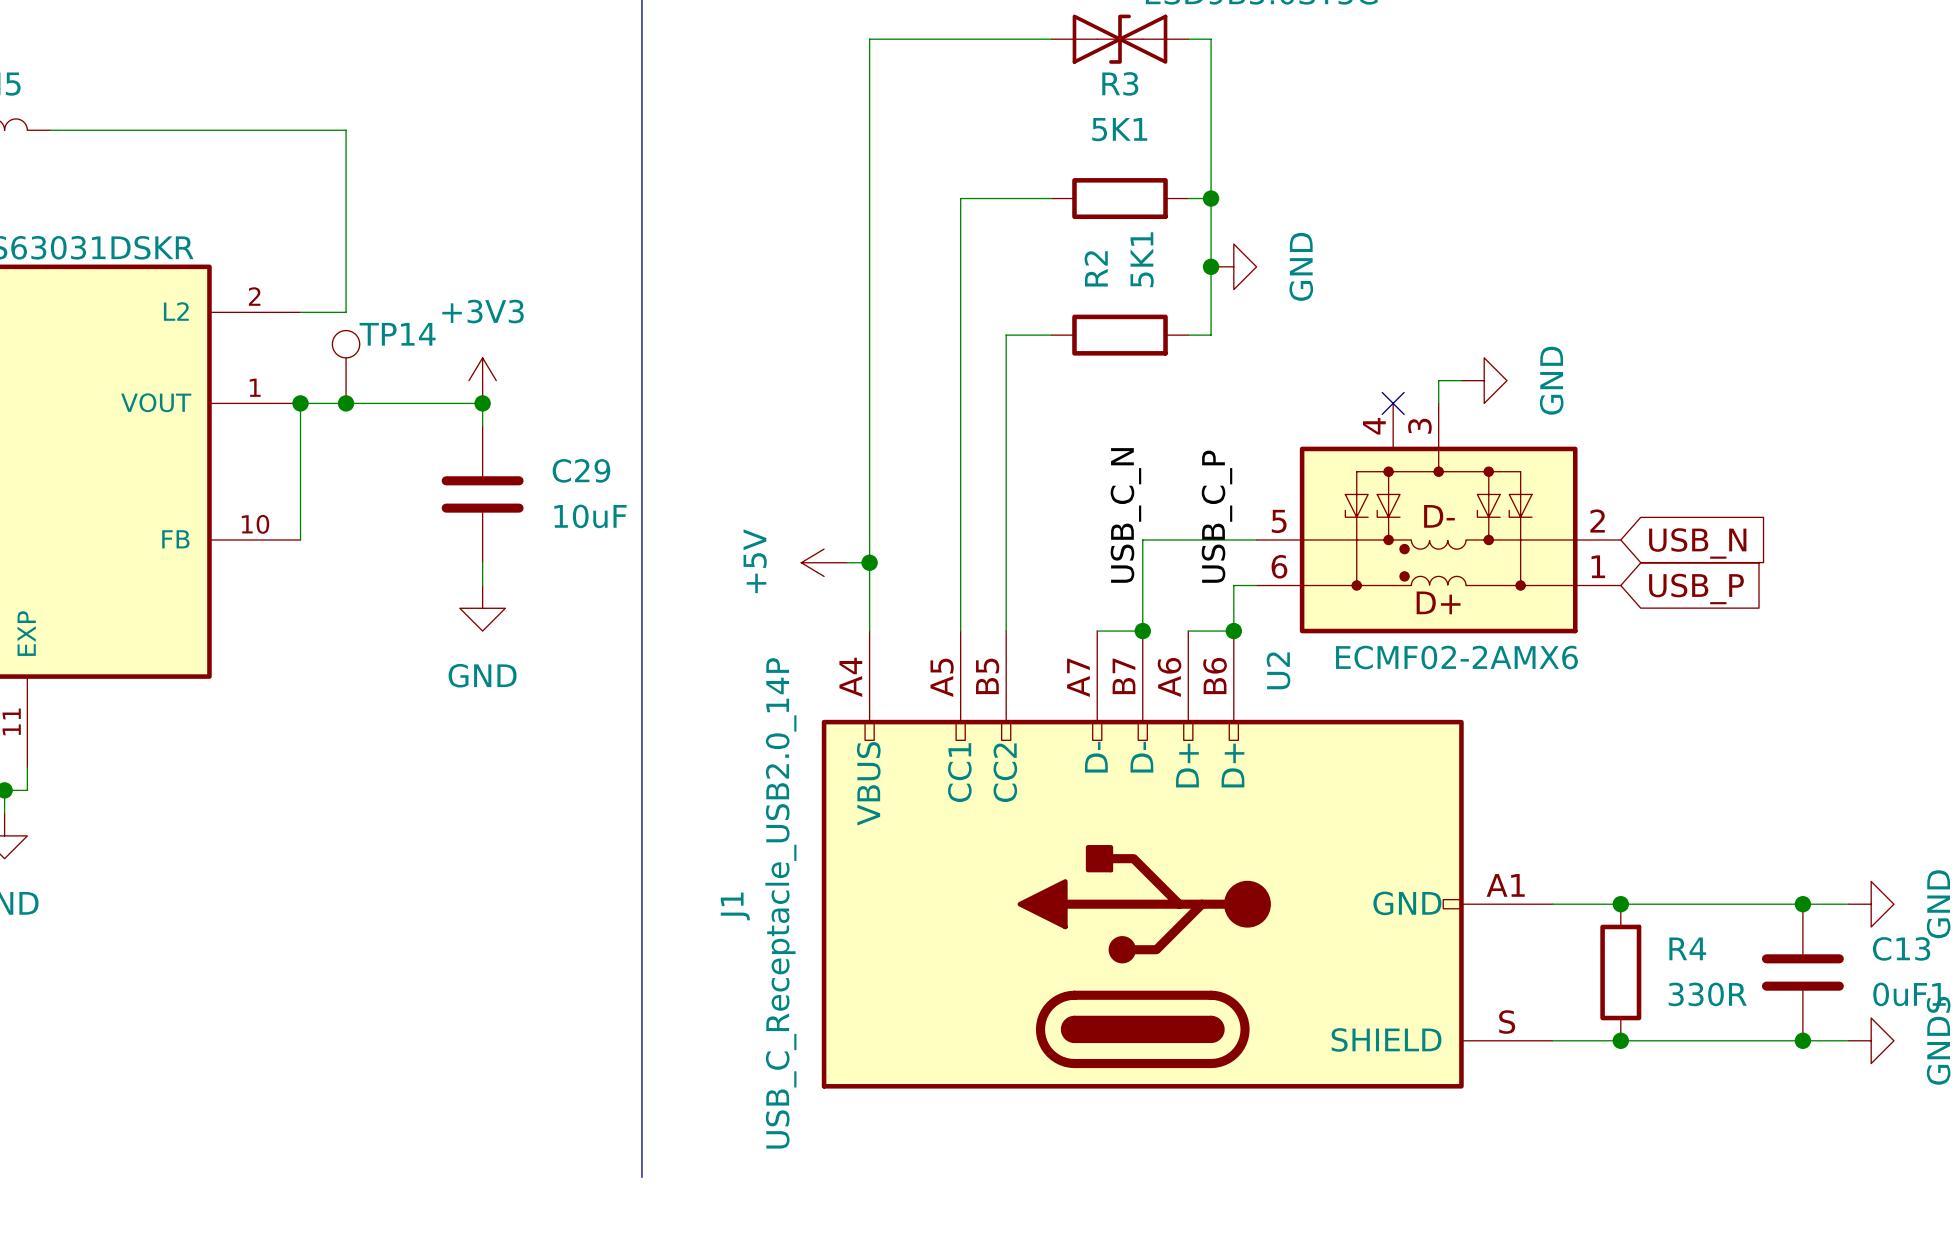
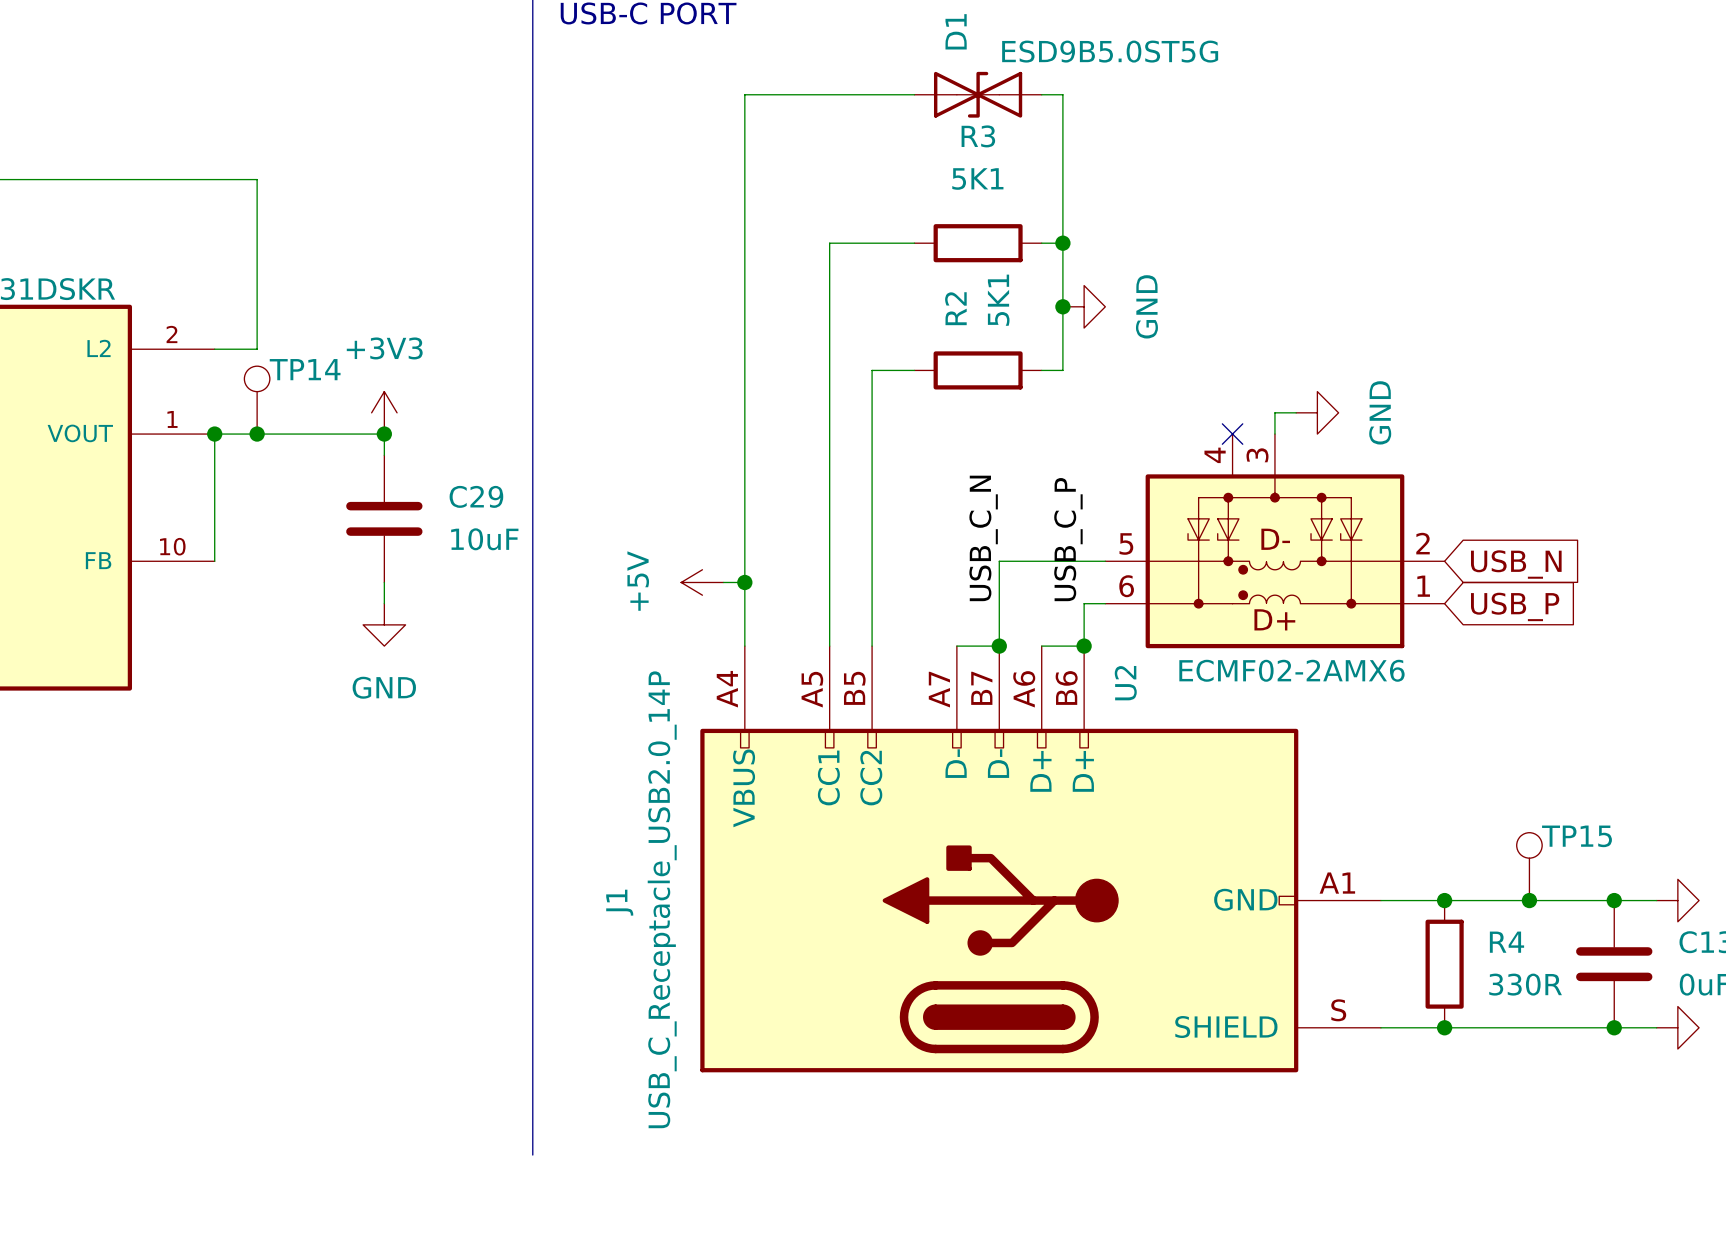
TP15: none -> (1529, 866)
junction: none -> (1529, 900)

